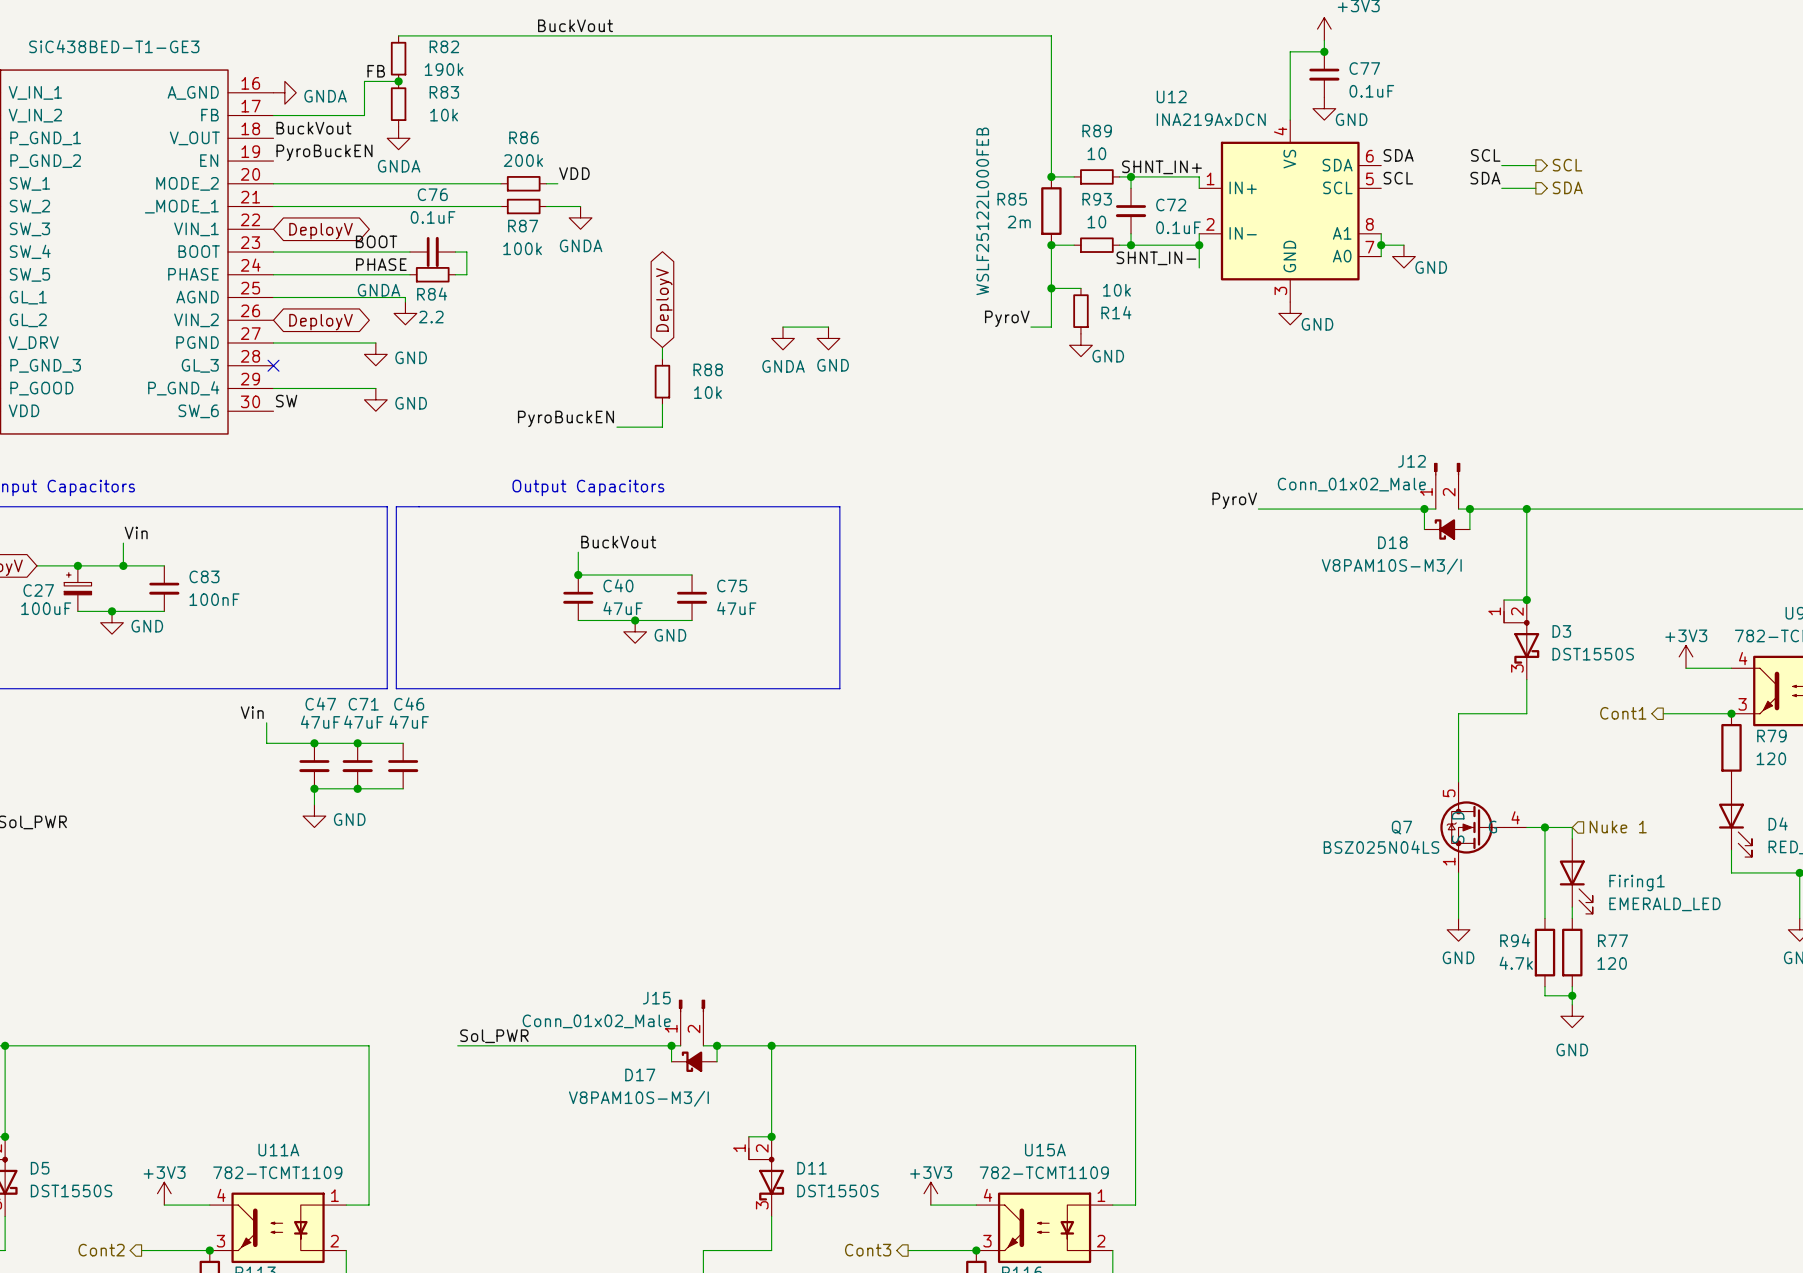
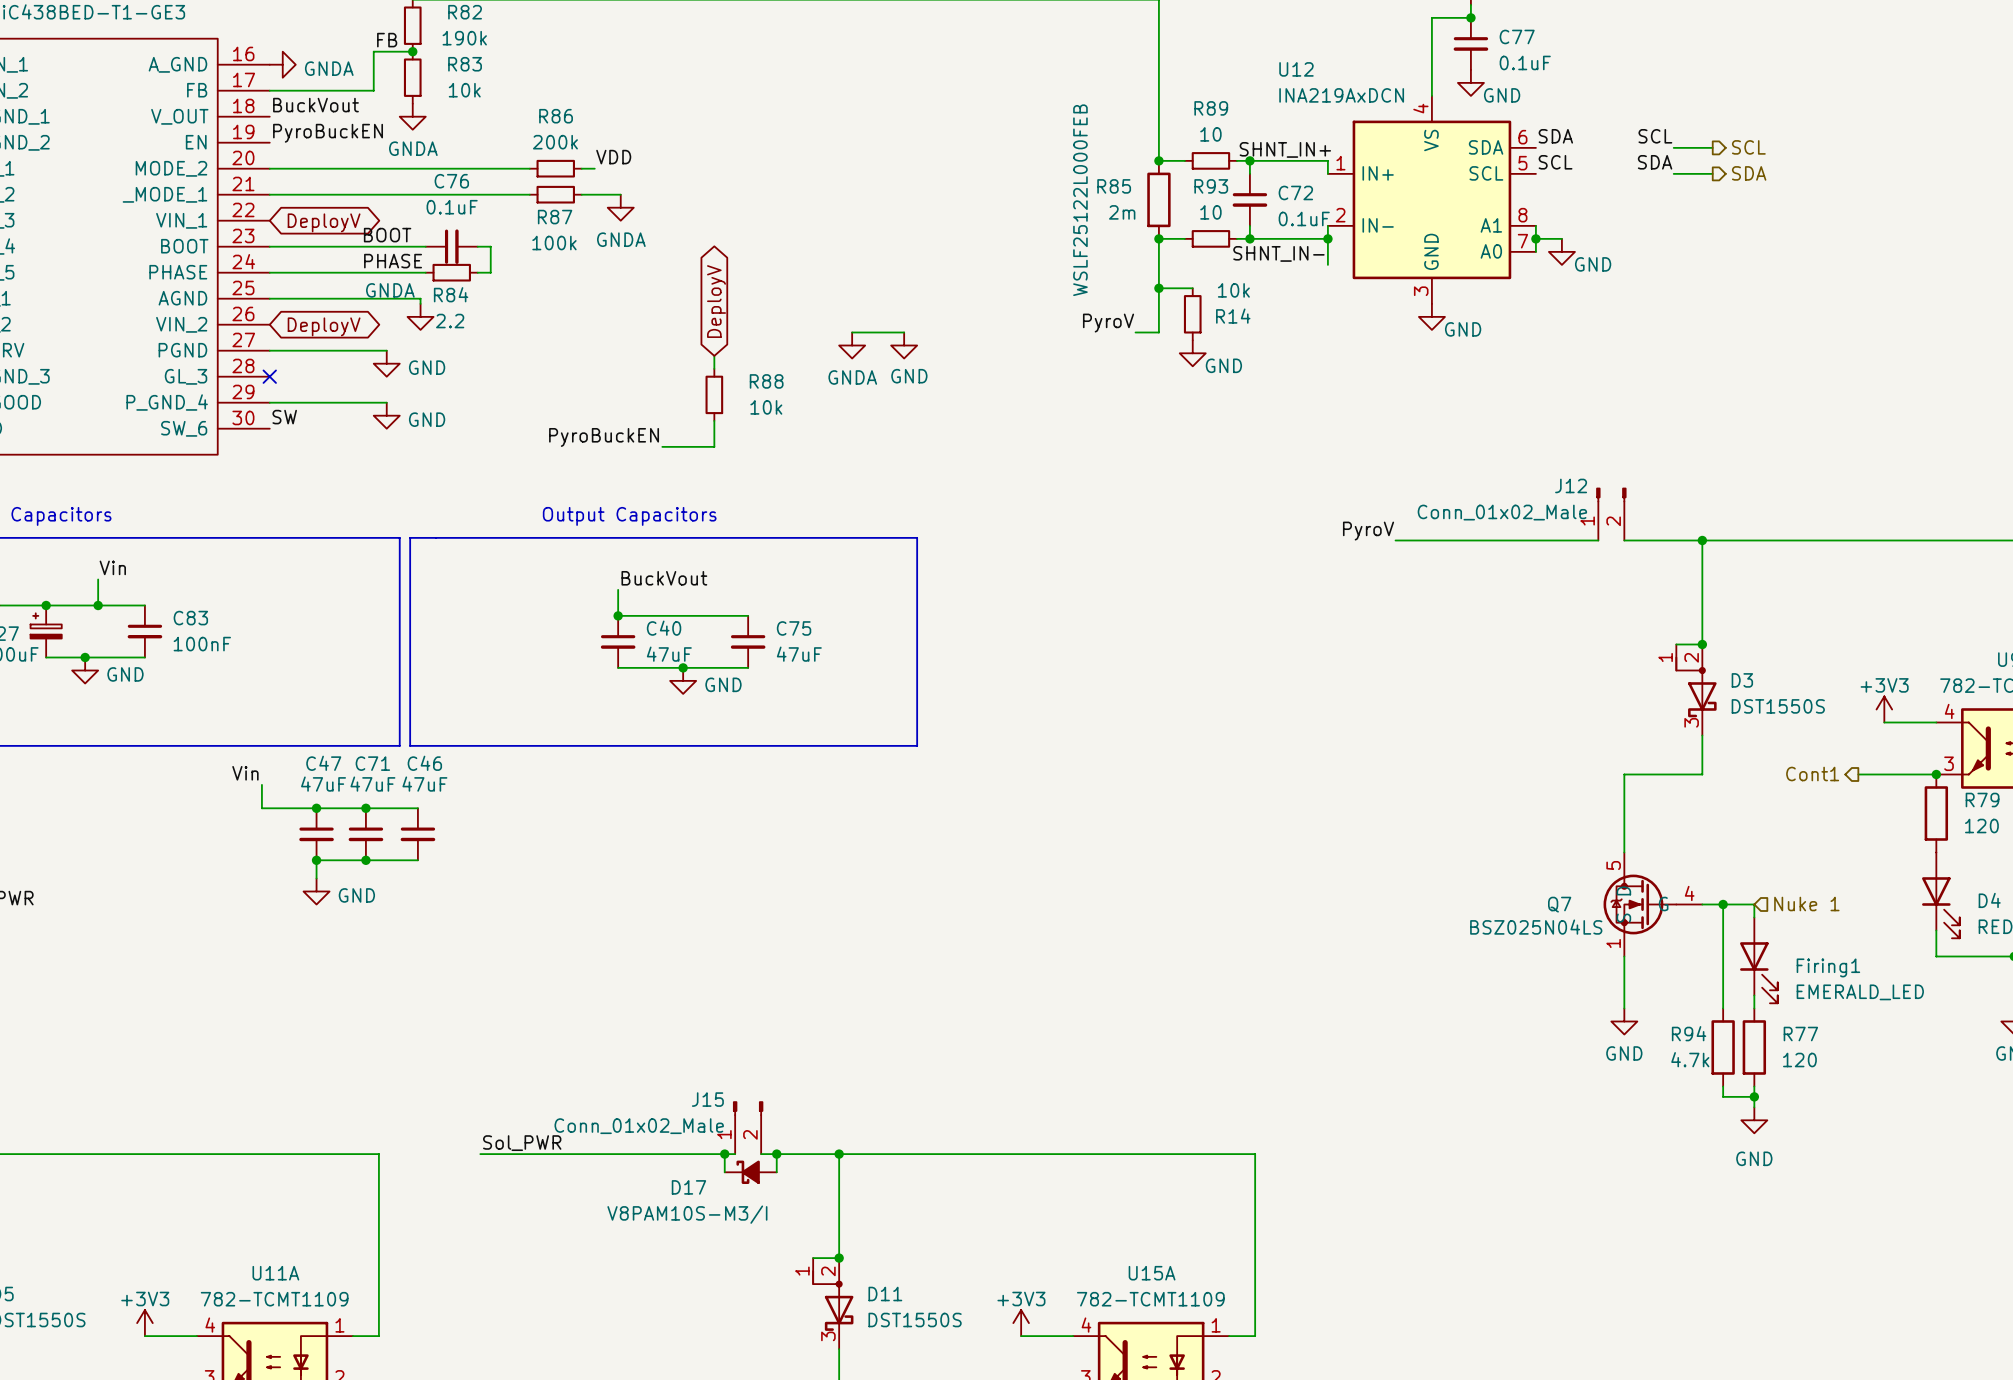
wire: (1424, 509) (1424, 529) -> none
junction: (1424, 509) -> none
wire: (1469, 509) (1469, 529) -> none
junction: (1469, 509) -> none
D18: V8PAM10S-M3/I (1447, 529) -> none

